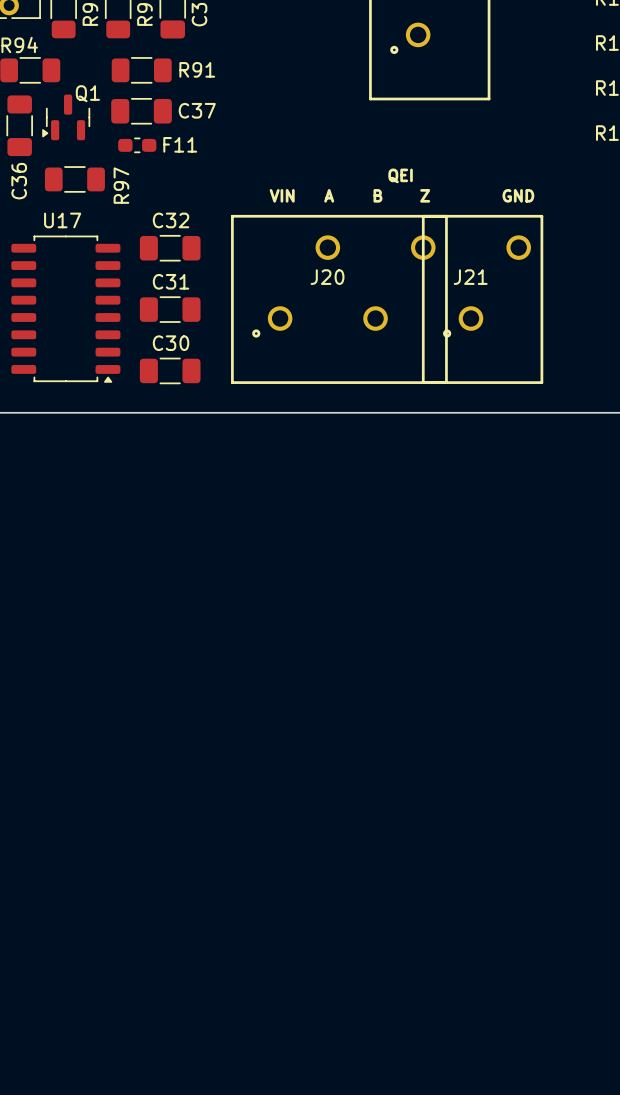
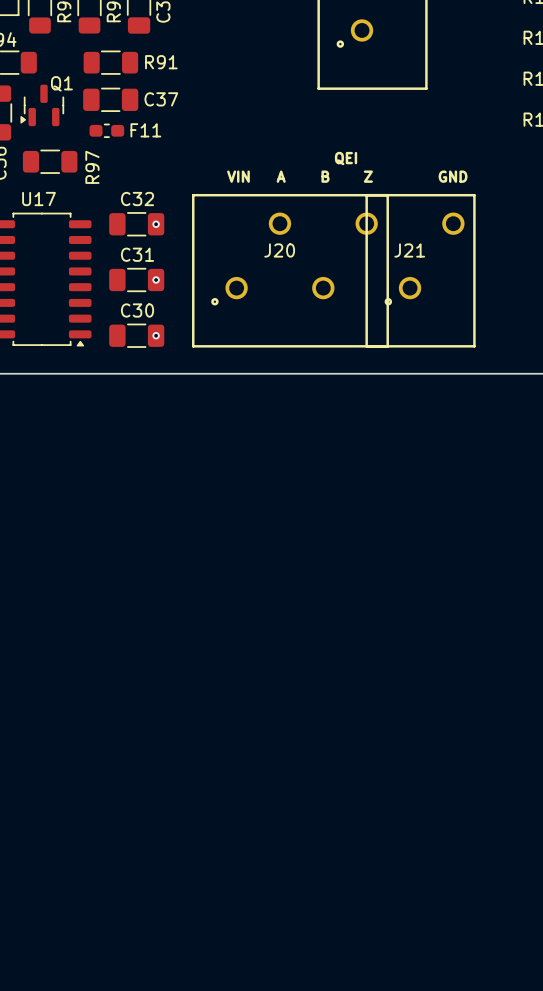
via: none -> (156, 224)
via: none -> (156, 279)
via: none -> (156, 335)

